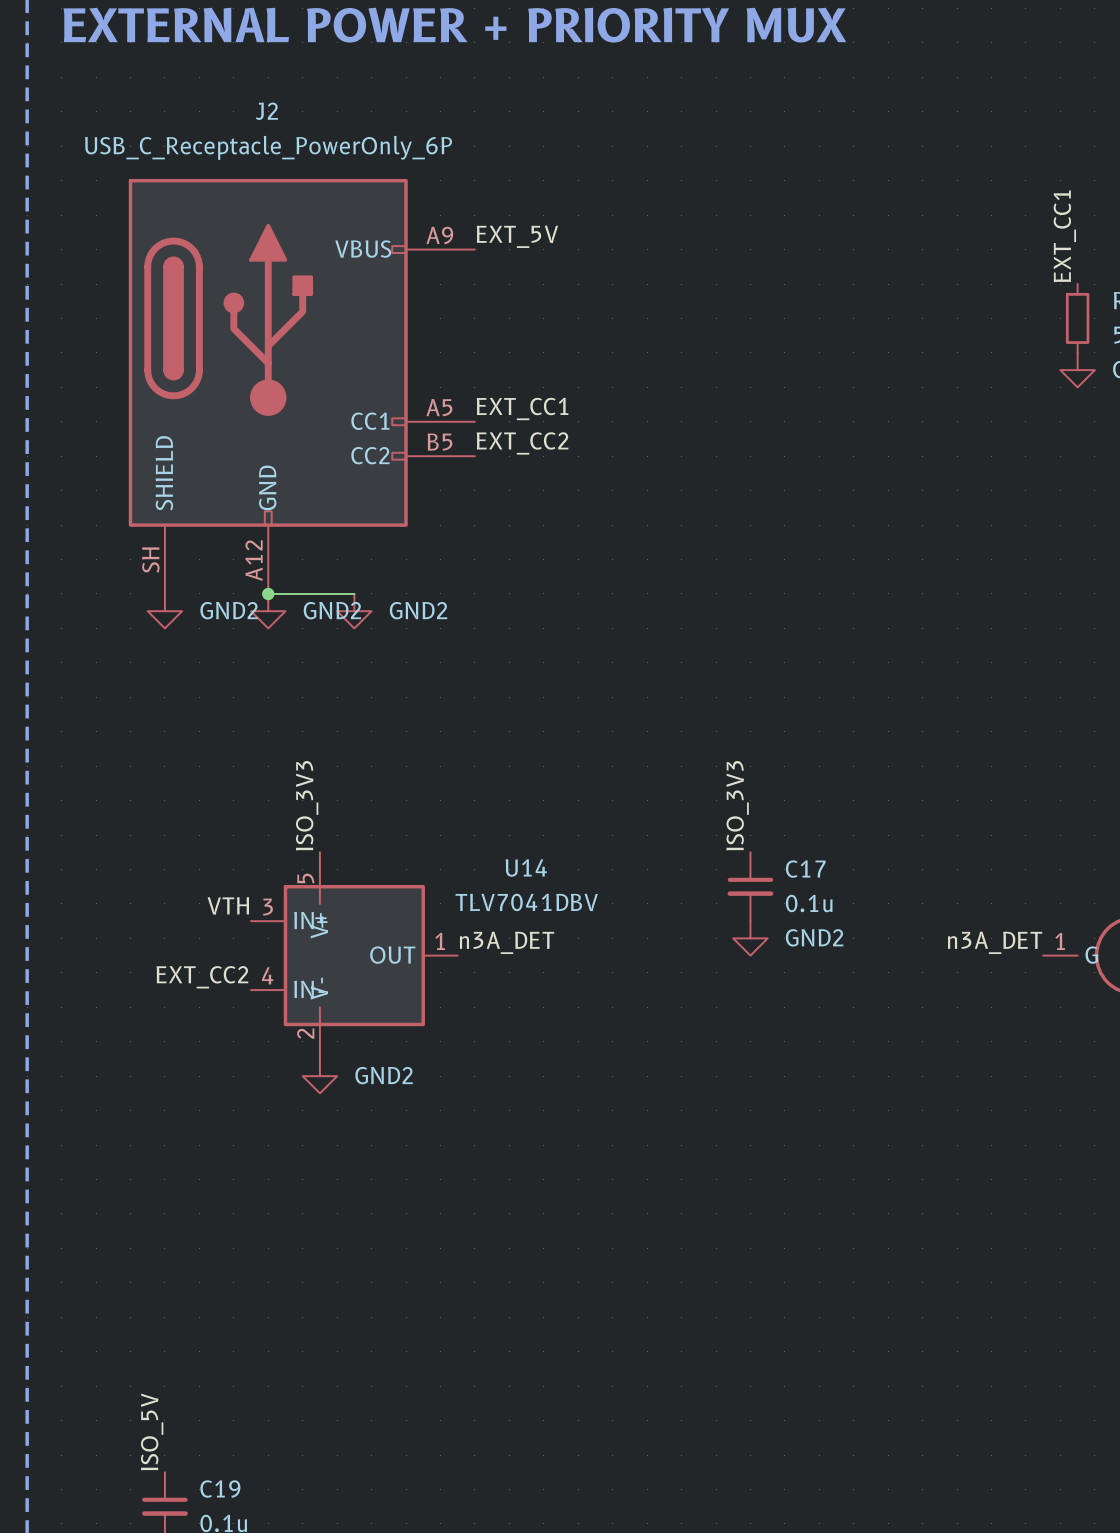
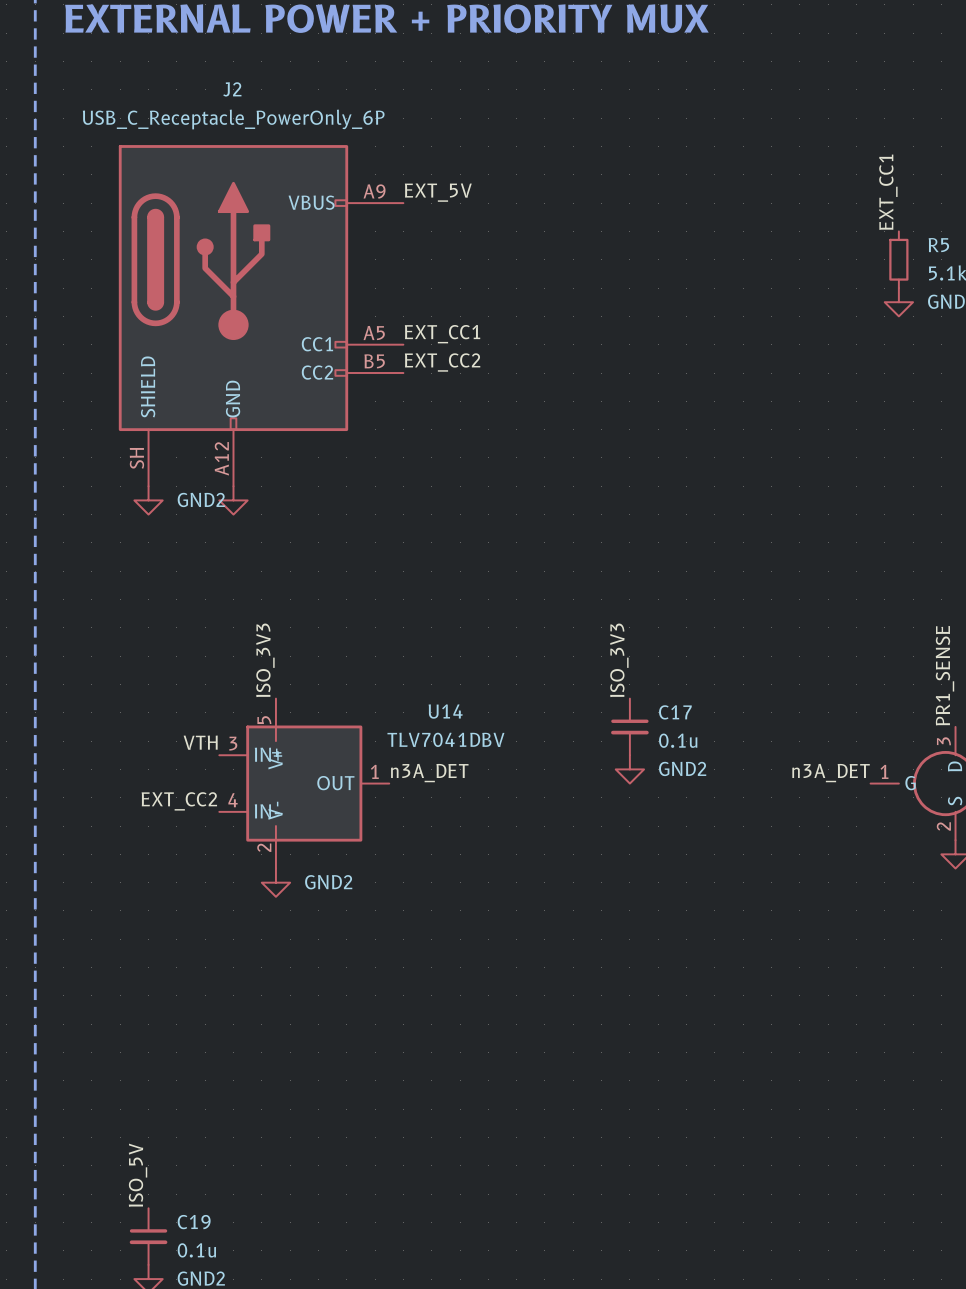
wire: (268, 593) (354, 593) -> none
junction: (268, 593) -> none
power symbol text: GND2 (332, 610) -> none
power symbol: GND2 (354, 611) -> none

